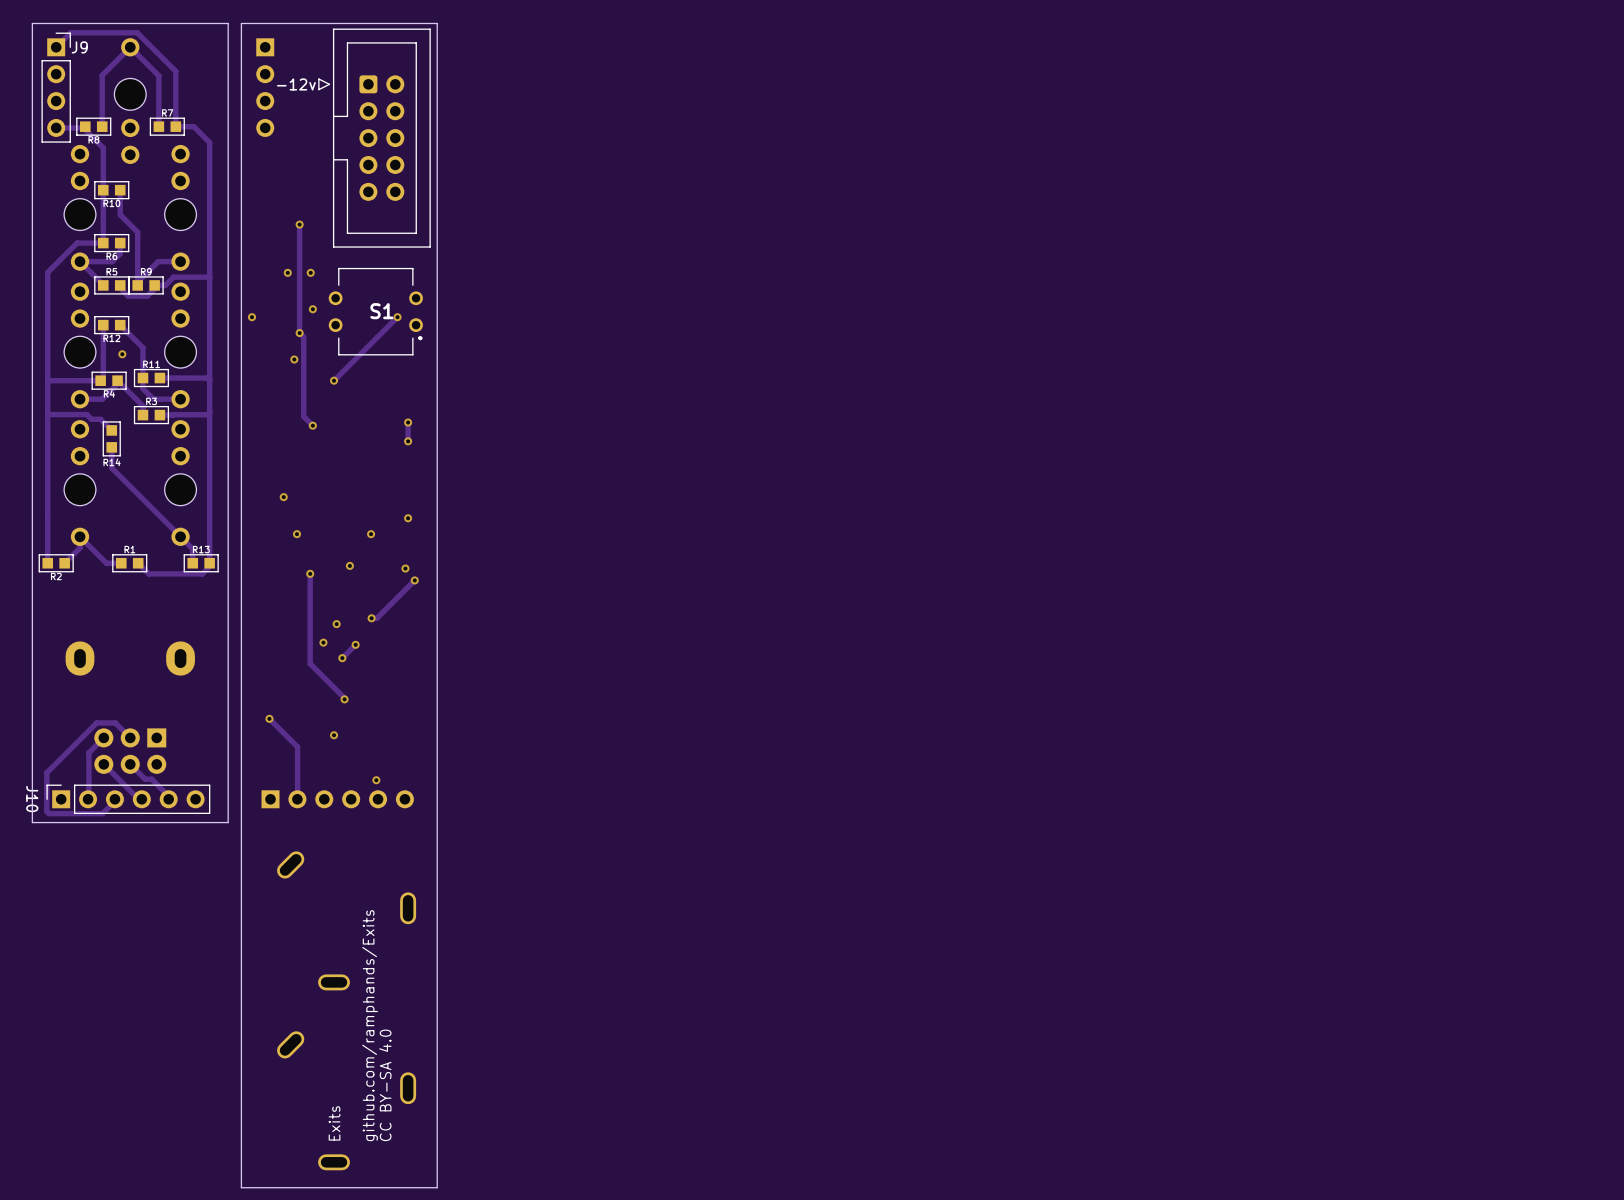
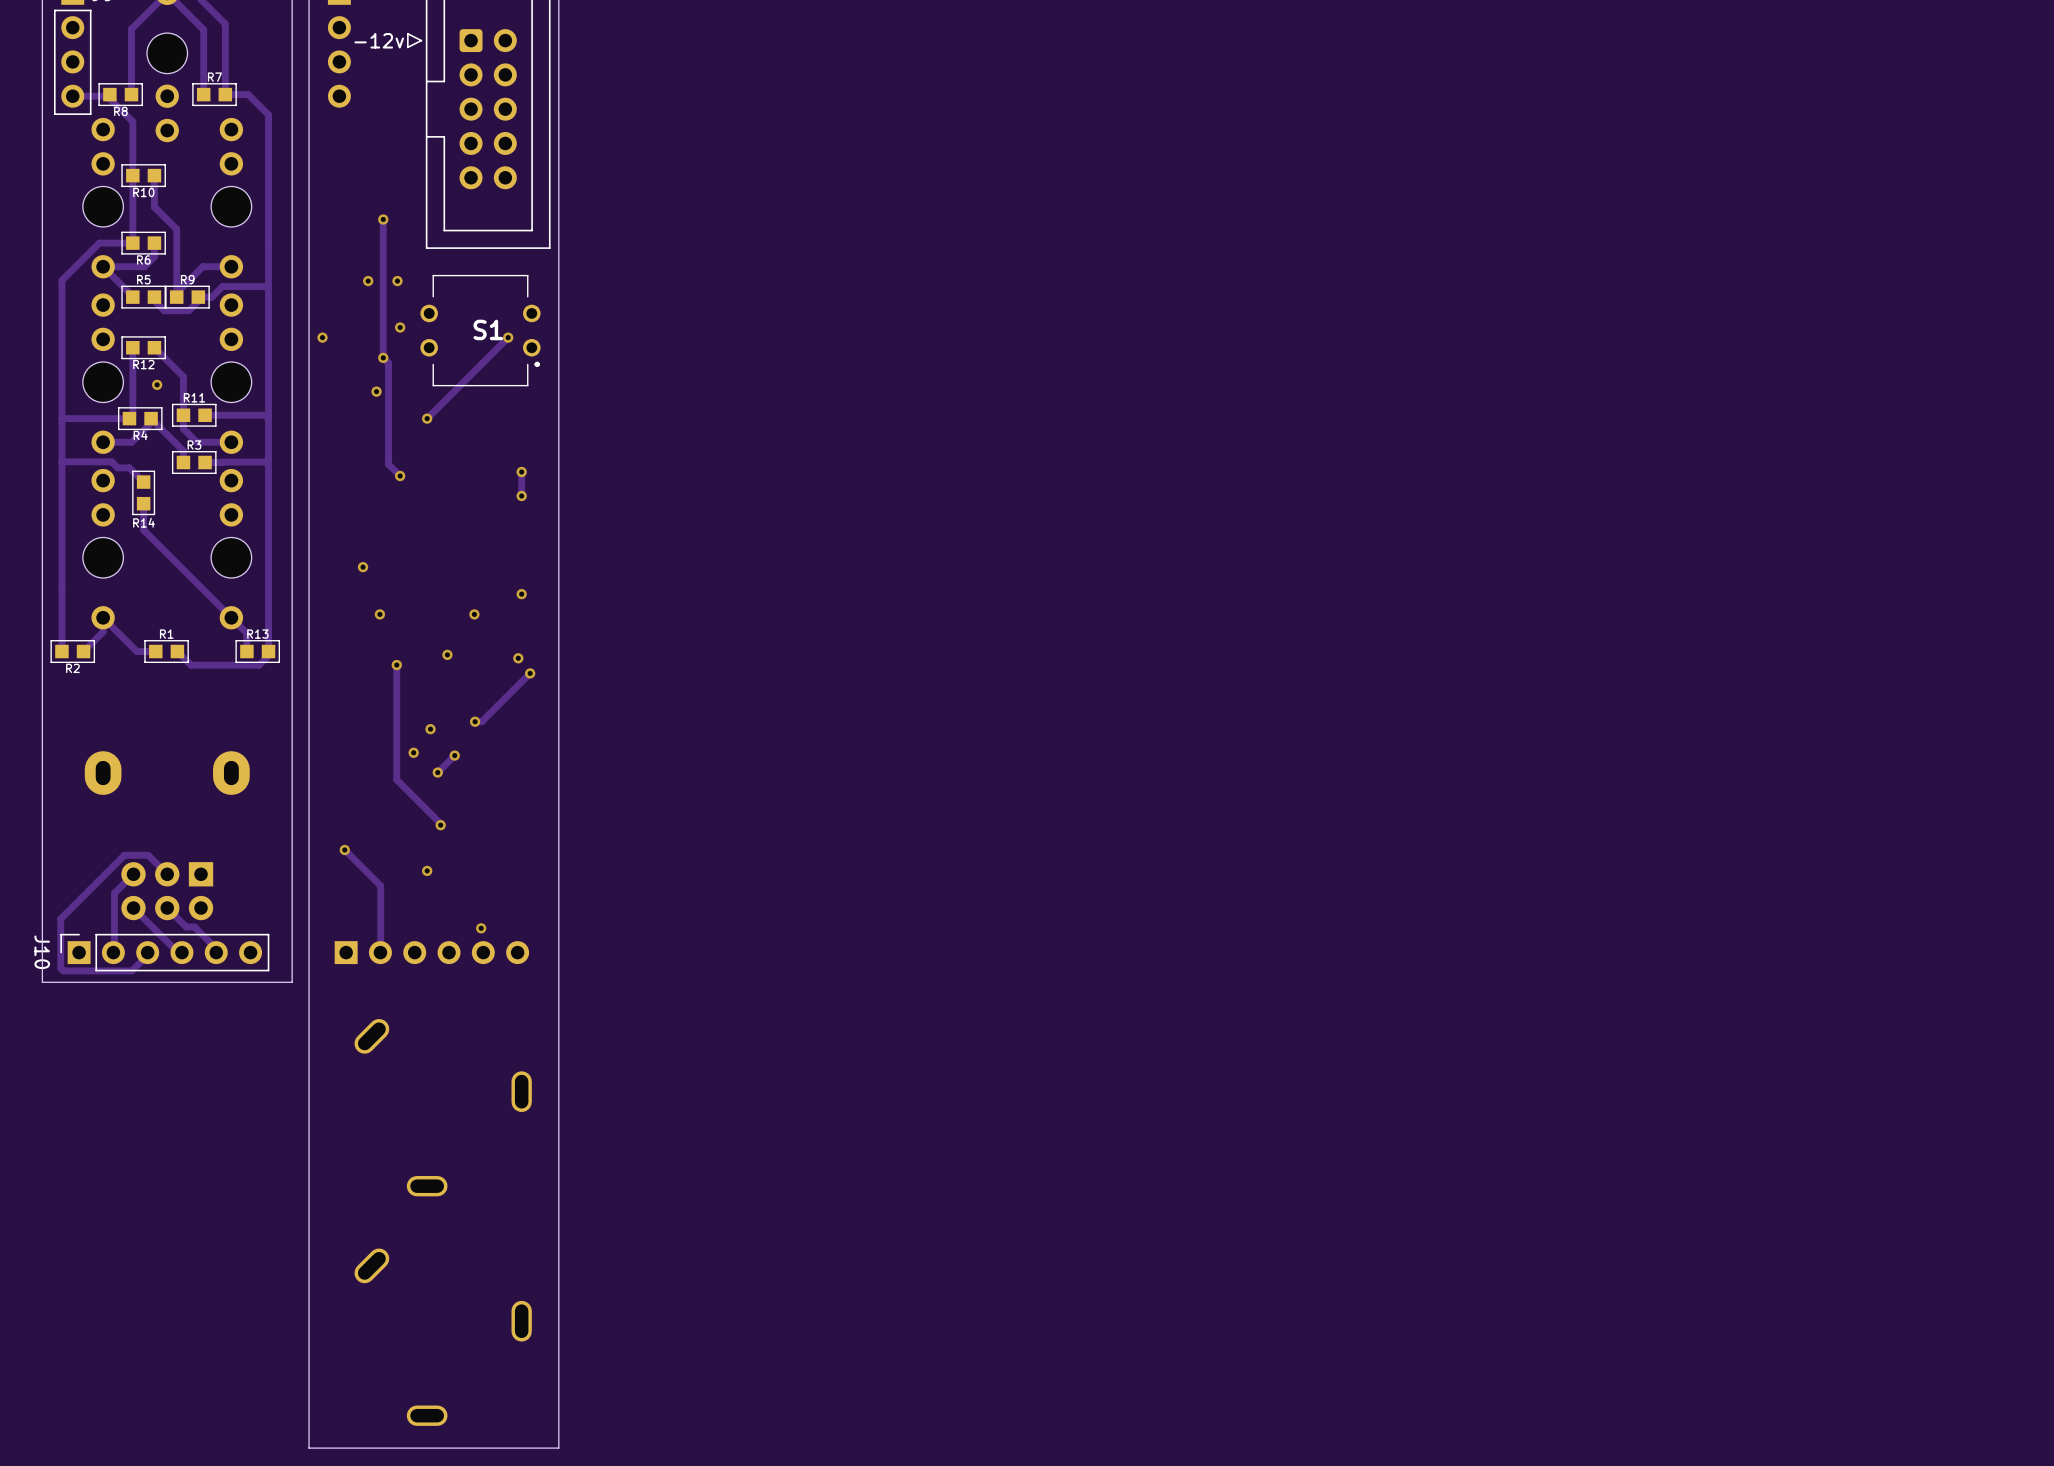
text: github.com/ramphands/Exits (370, 1025) -> none
text: CC BY-SA 4.0 (385, 1085) -> none
text: Exits (334, 1123) -> none

